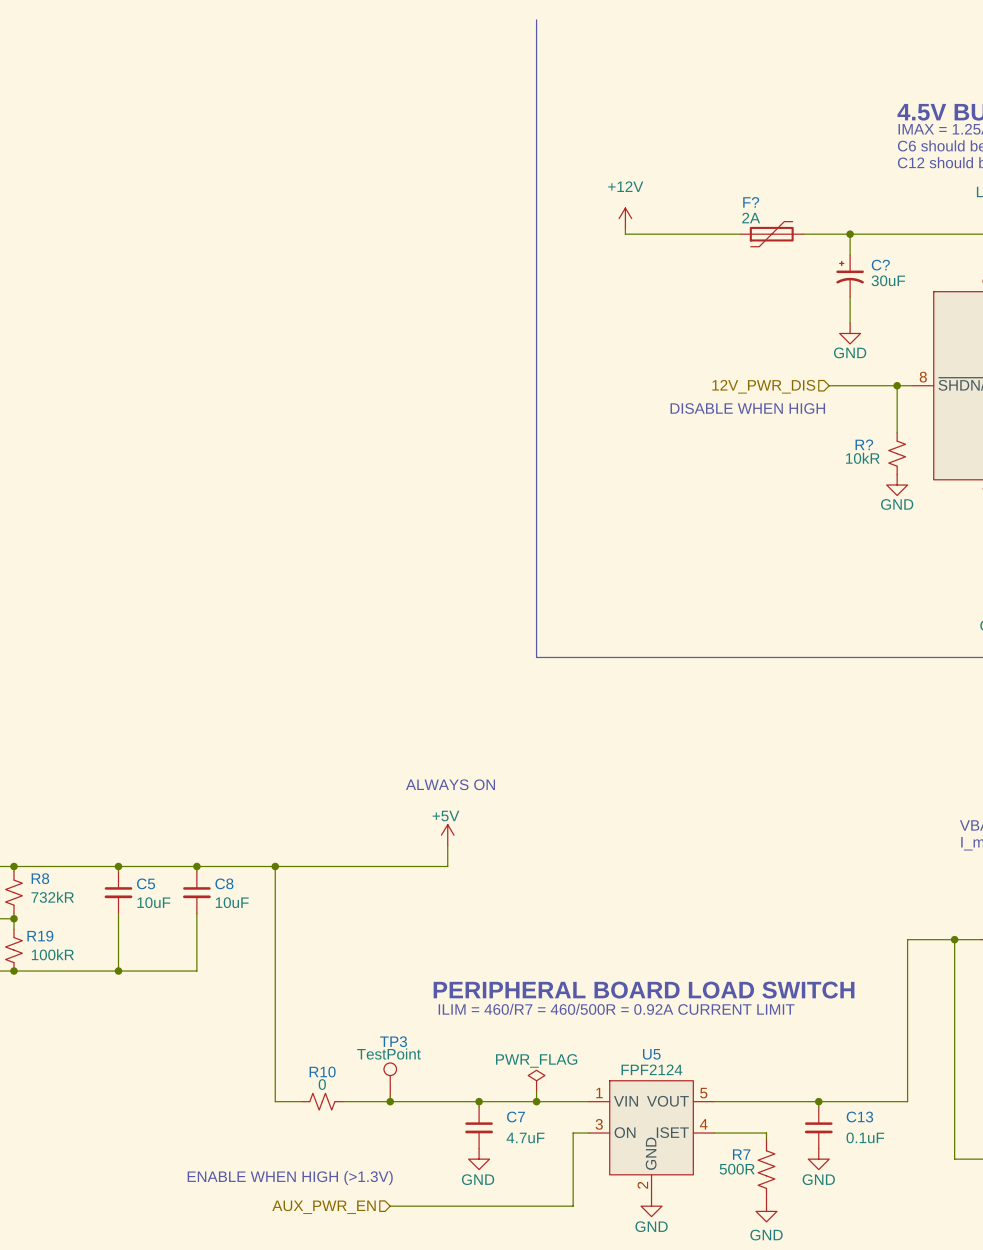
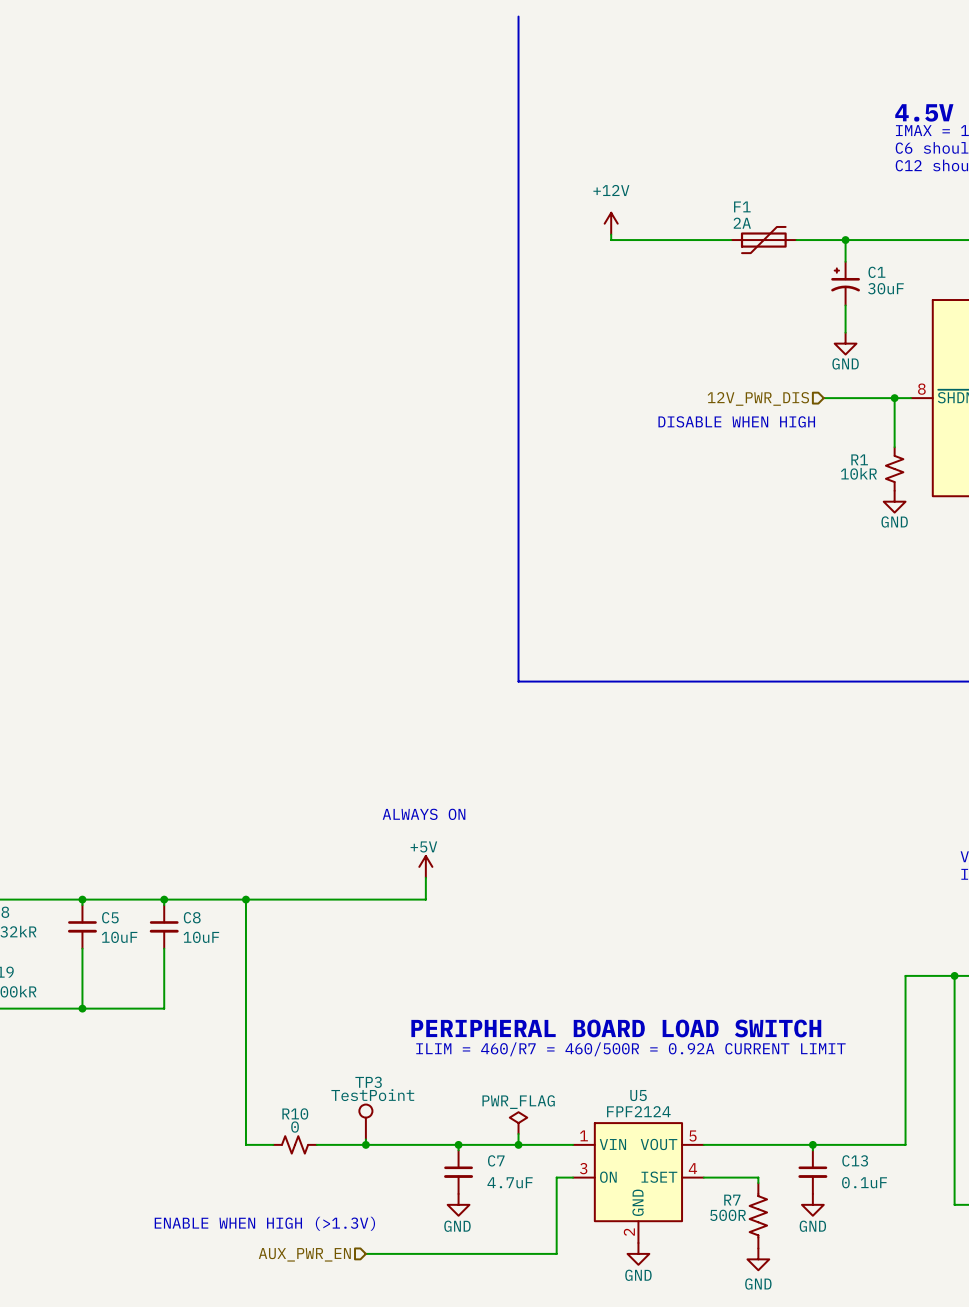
F? name: F? (751, 202) -> F1 (742, 206)
C? name: C? (880, 265) -> C1 (876, 272)
R? name: R? (864, 444) -> R1 (859, 459)

